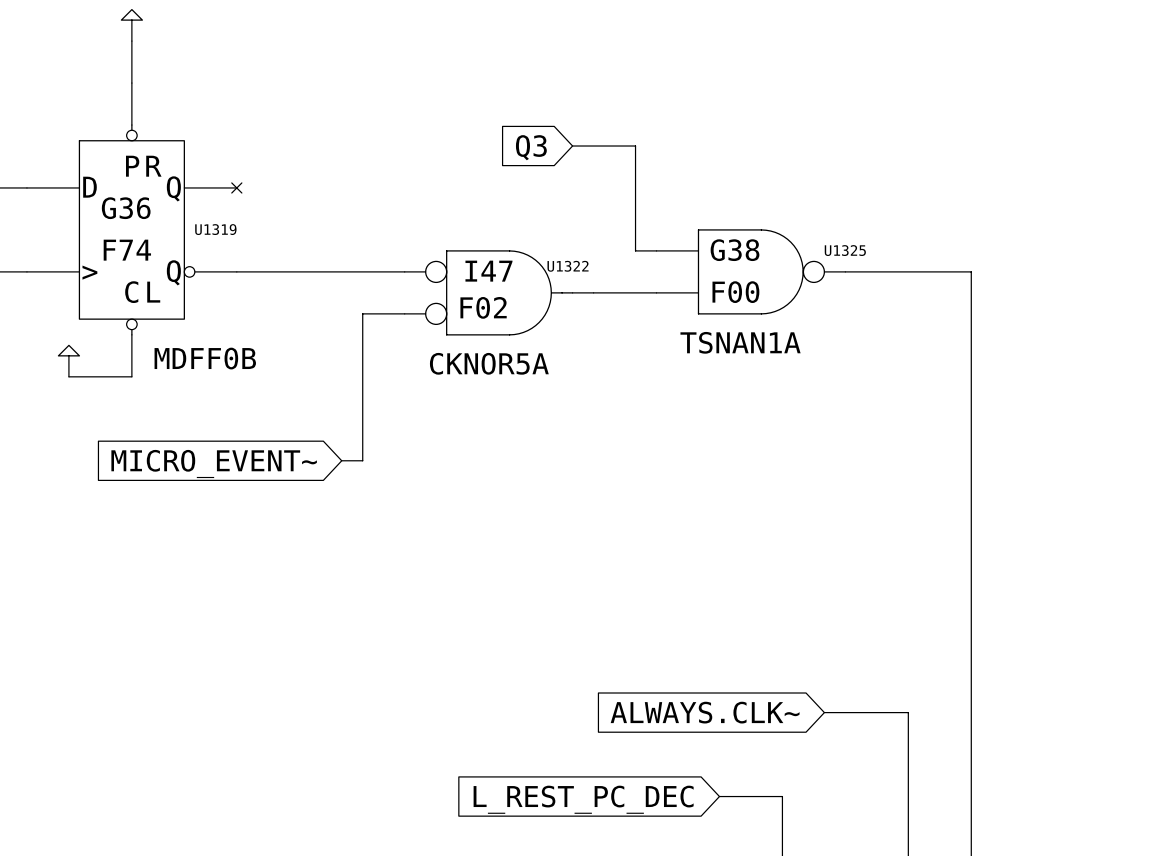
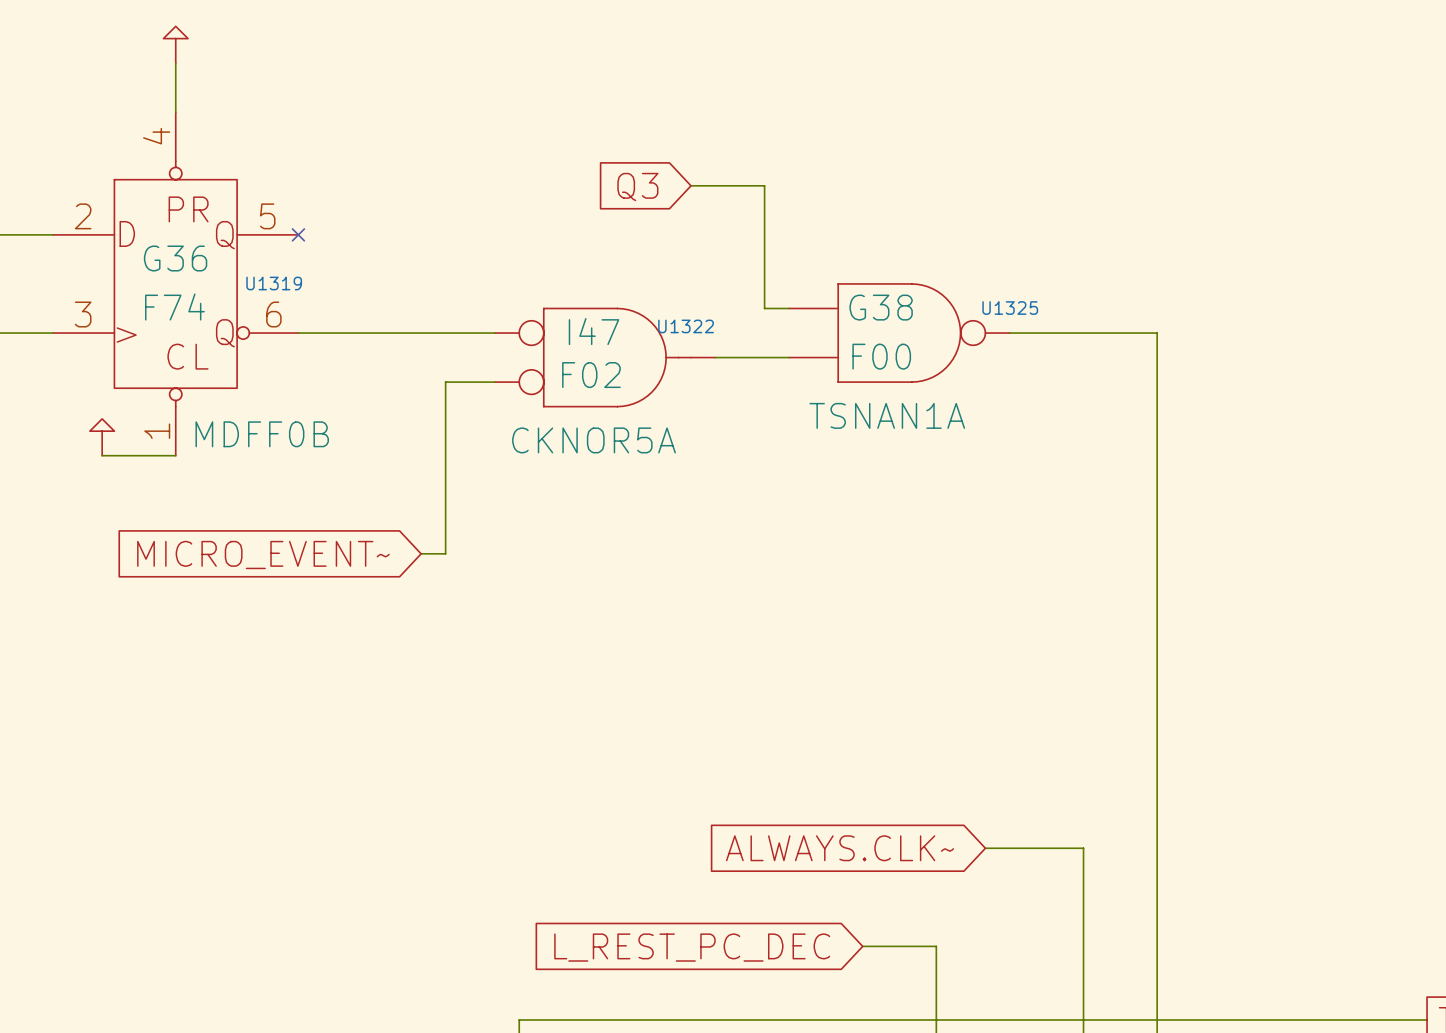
U1319 pin number: none -> 4 (156, 136)
U1319 pin number: none -> 2 (83, 216)
U1319 pin number: none -> 5 (267, 216)
U1319 pin number: none -> 3 (83, 314)
U1319 pin number: none -> 6 (273, 314)
U1319 pin number: none -> 1 (157, 431)

